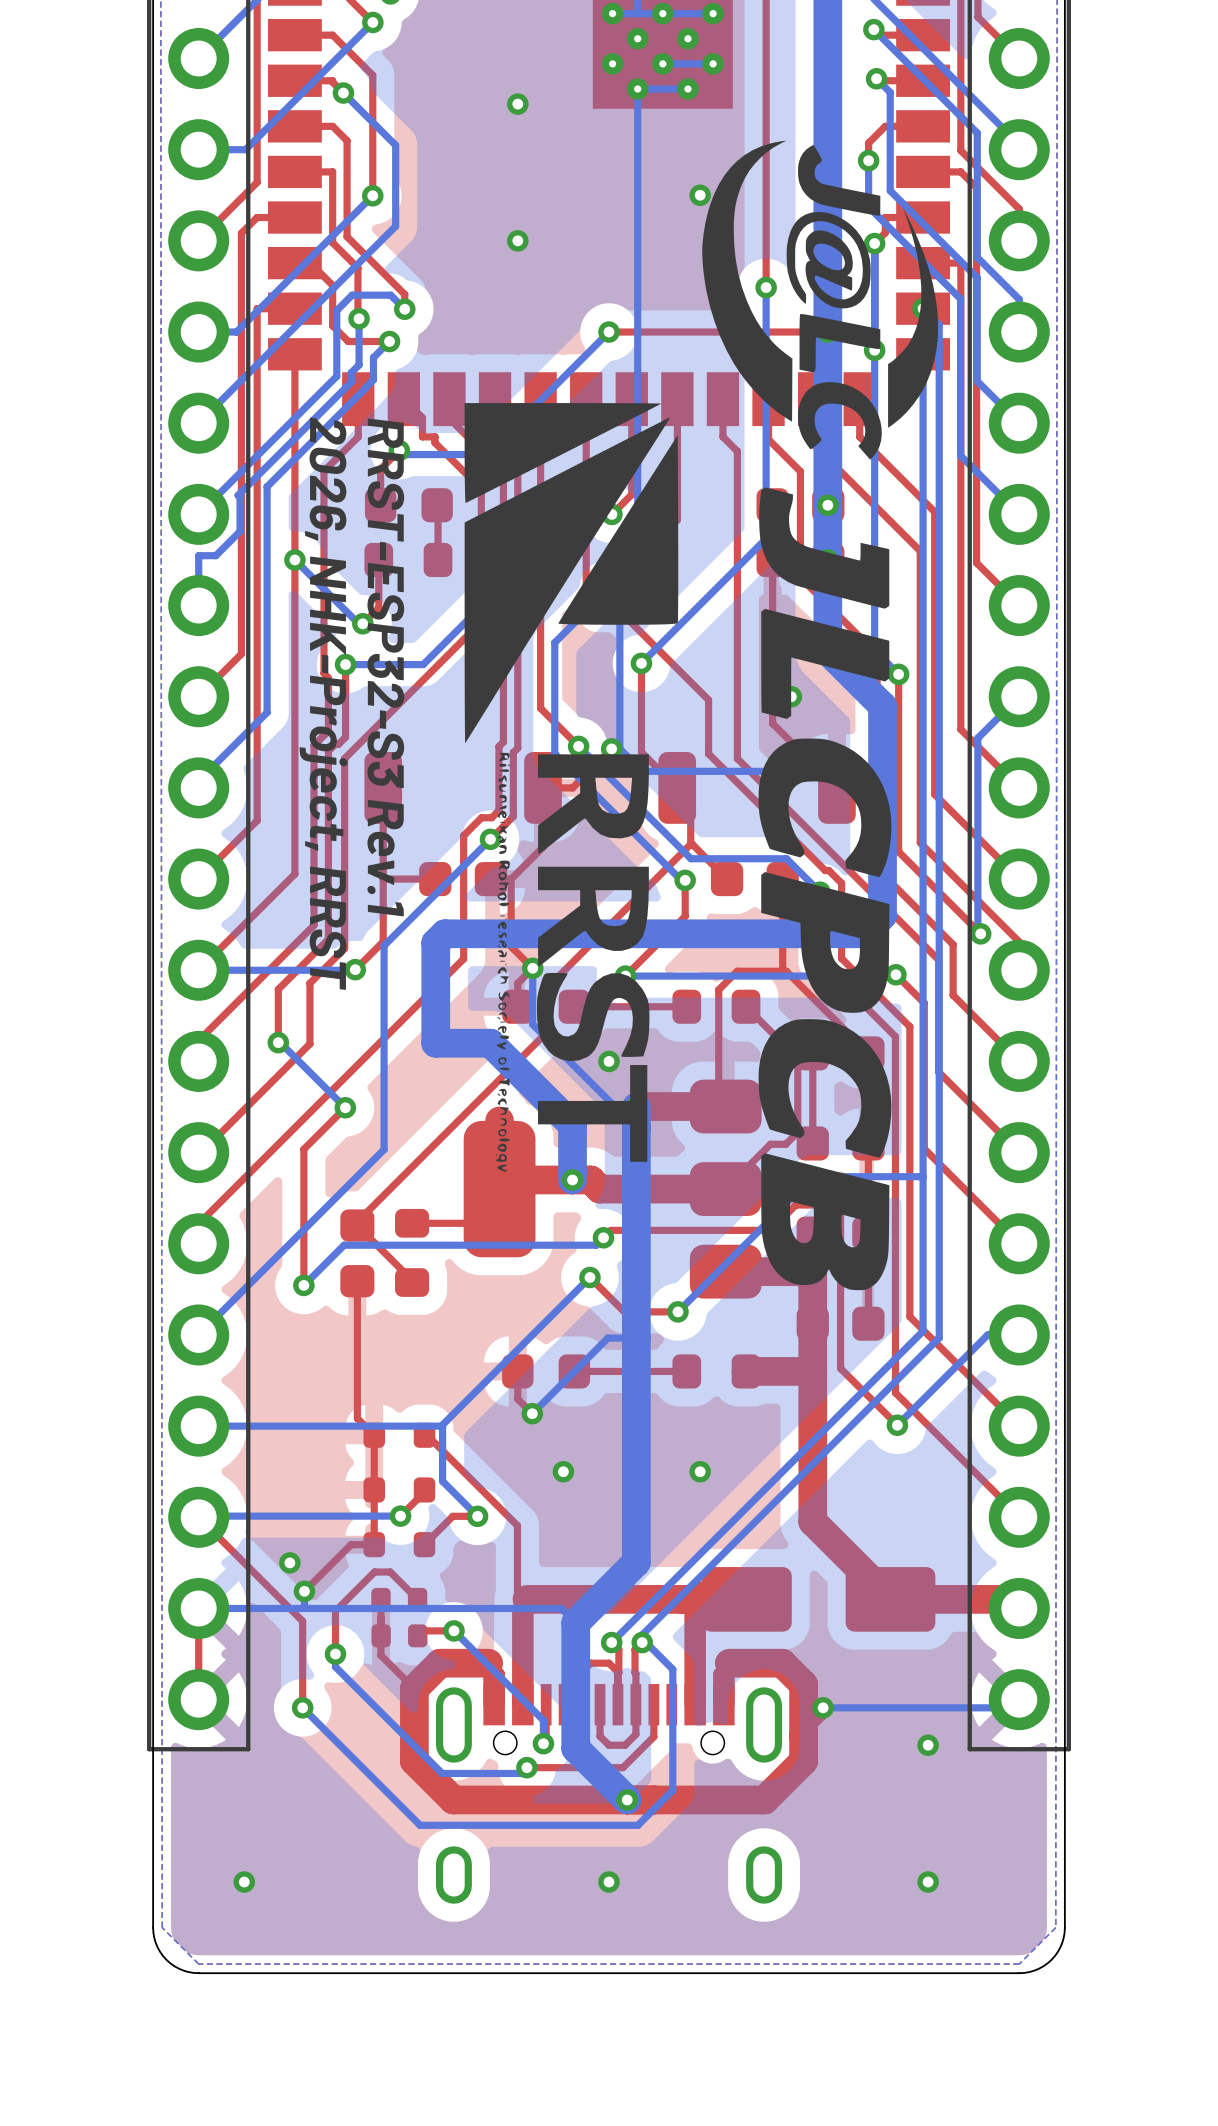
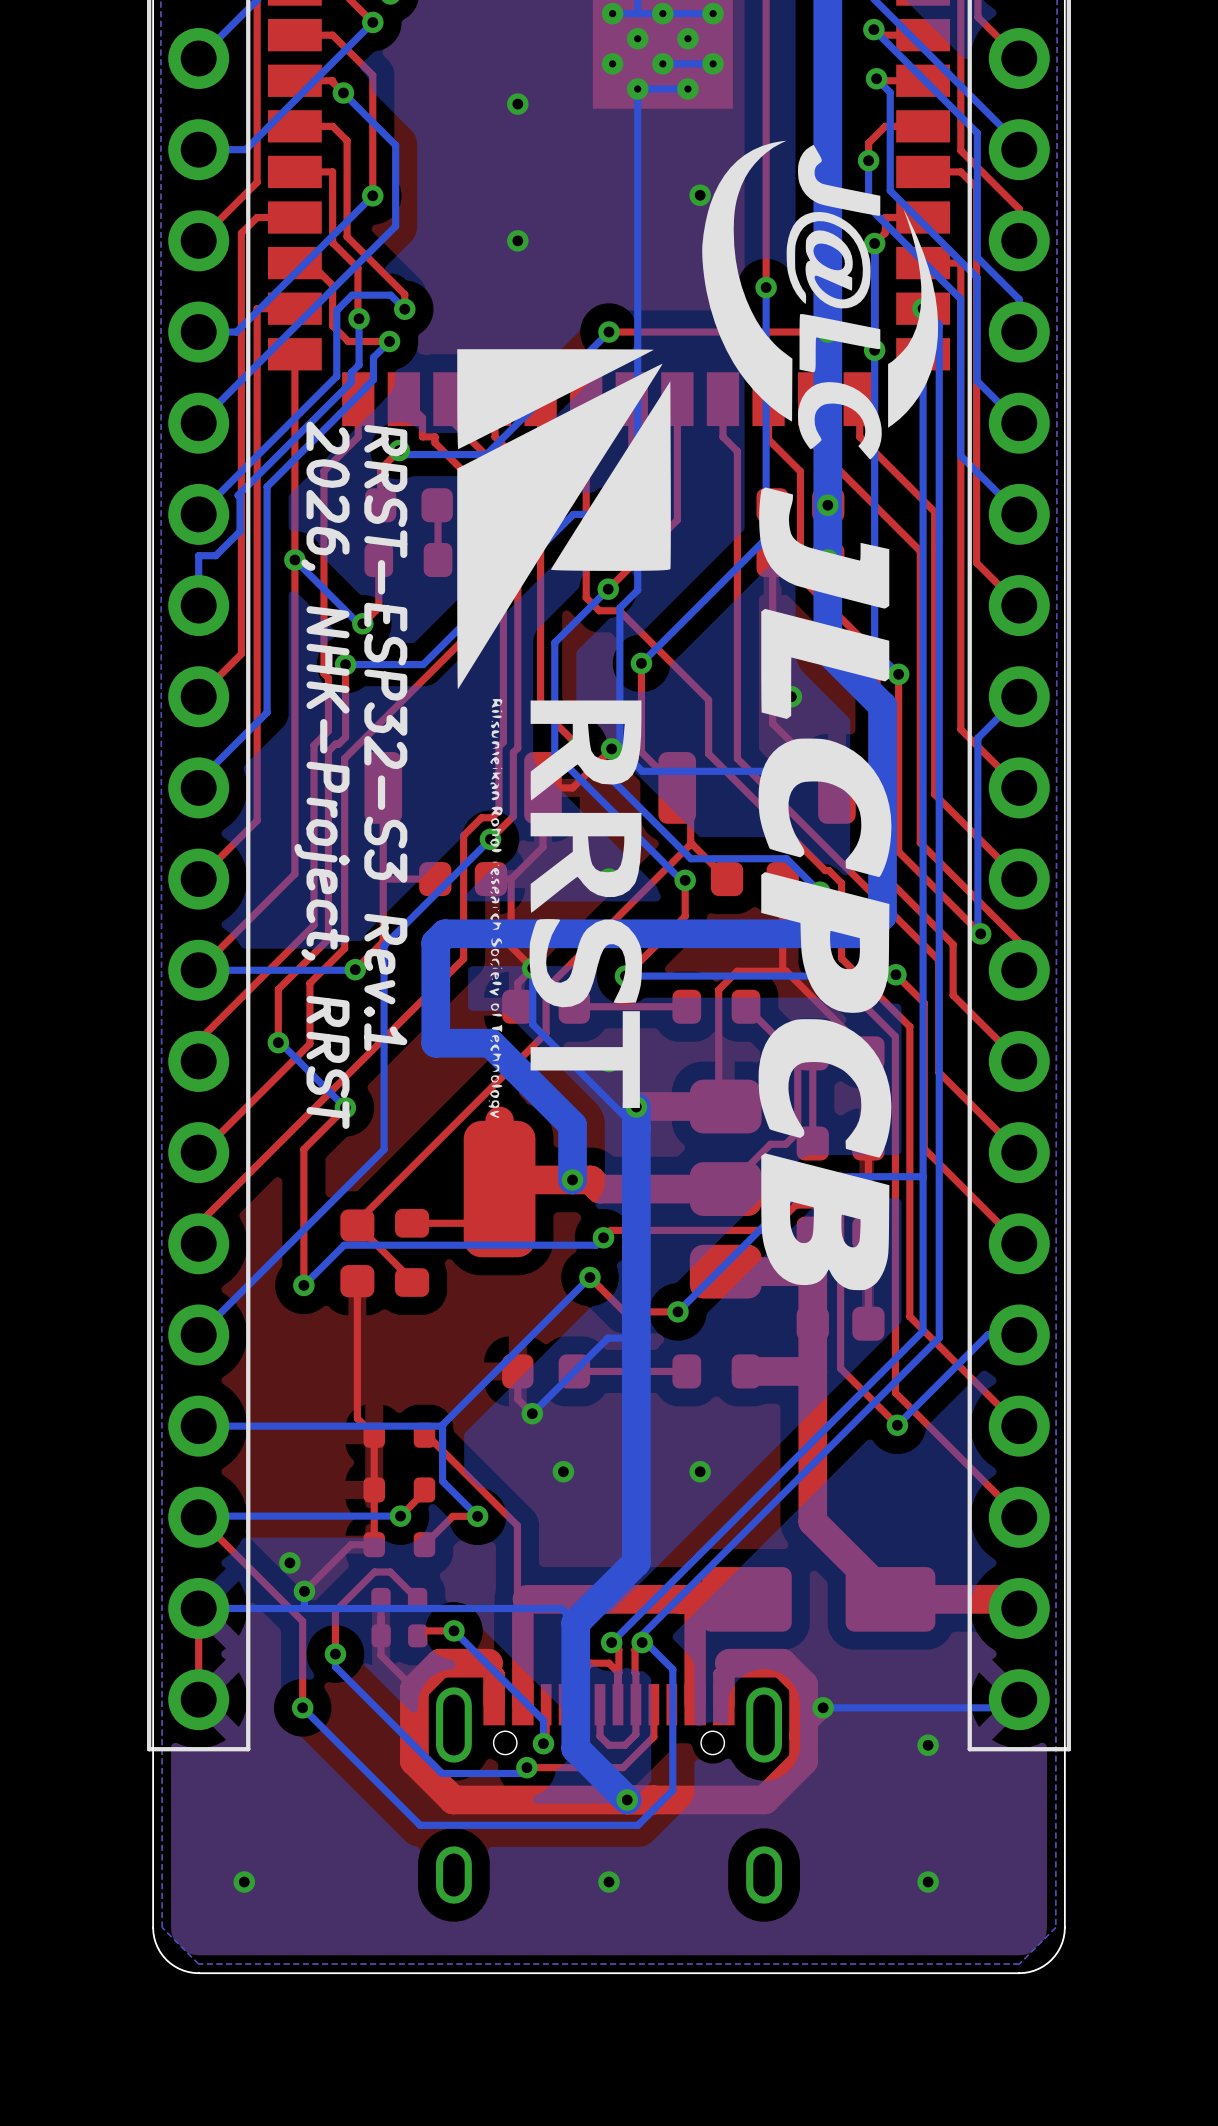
drawing position: (571, 787) -> (564, 733)

